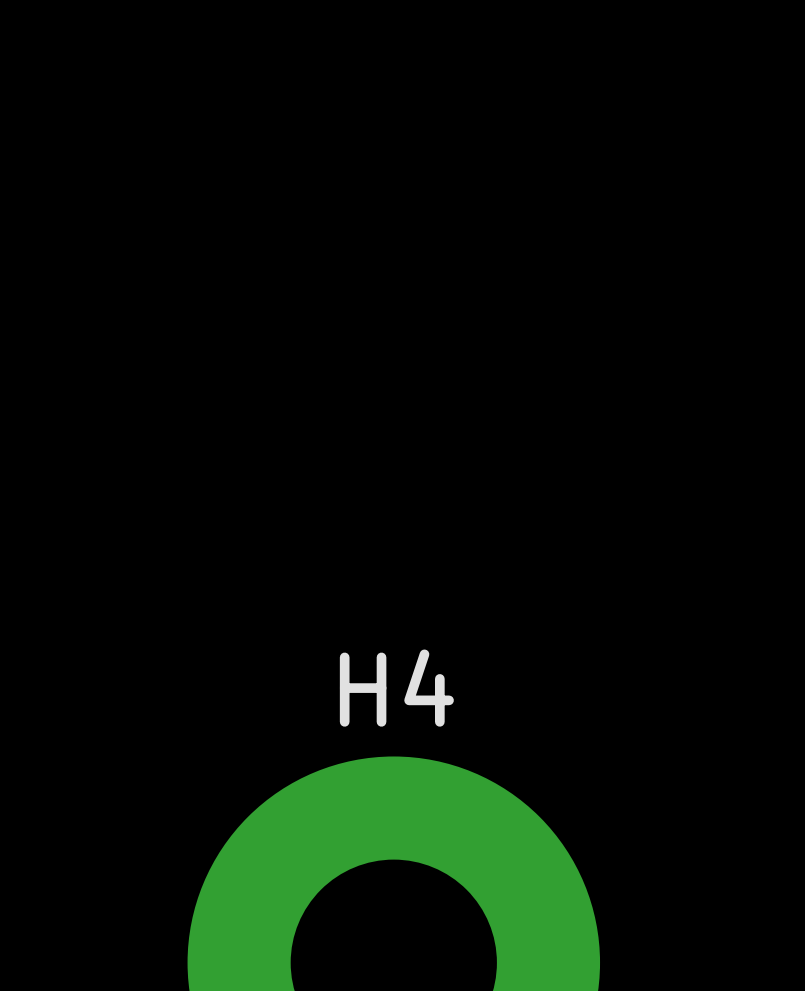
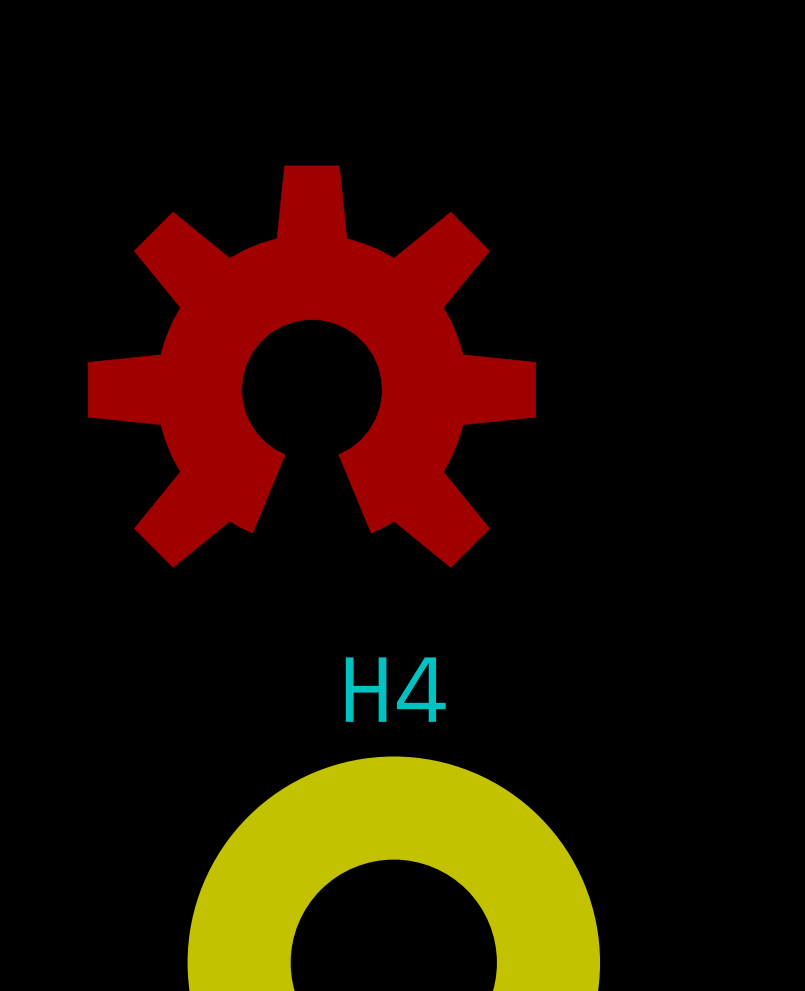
drawing: none -> [87, 165, 537, 568]

